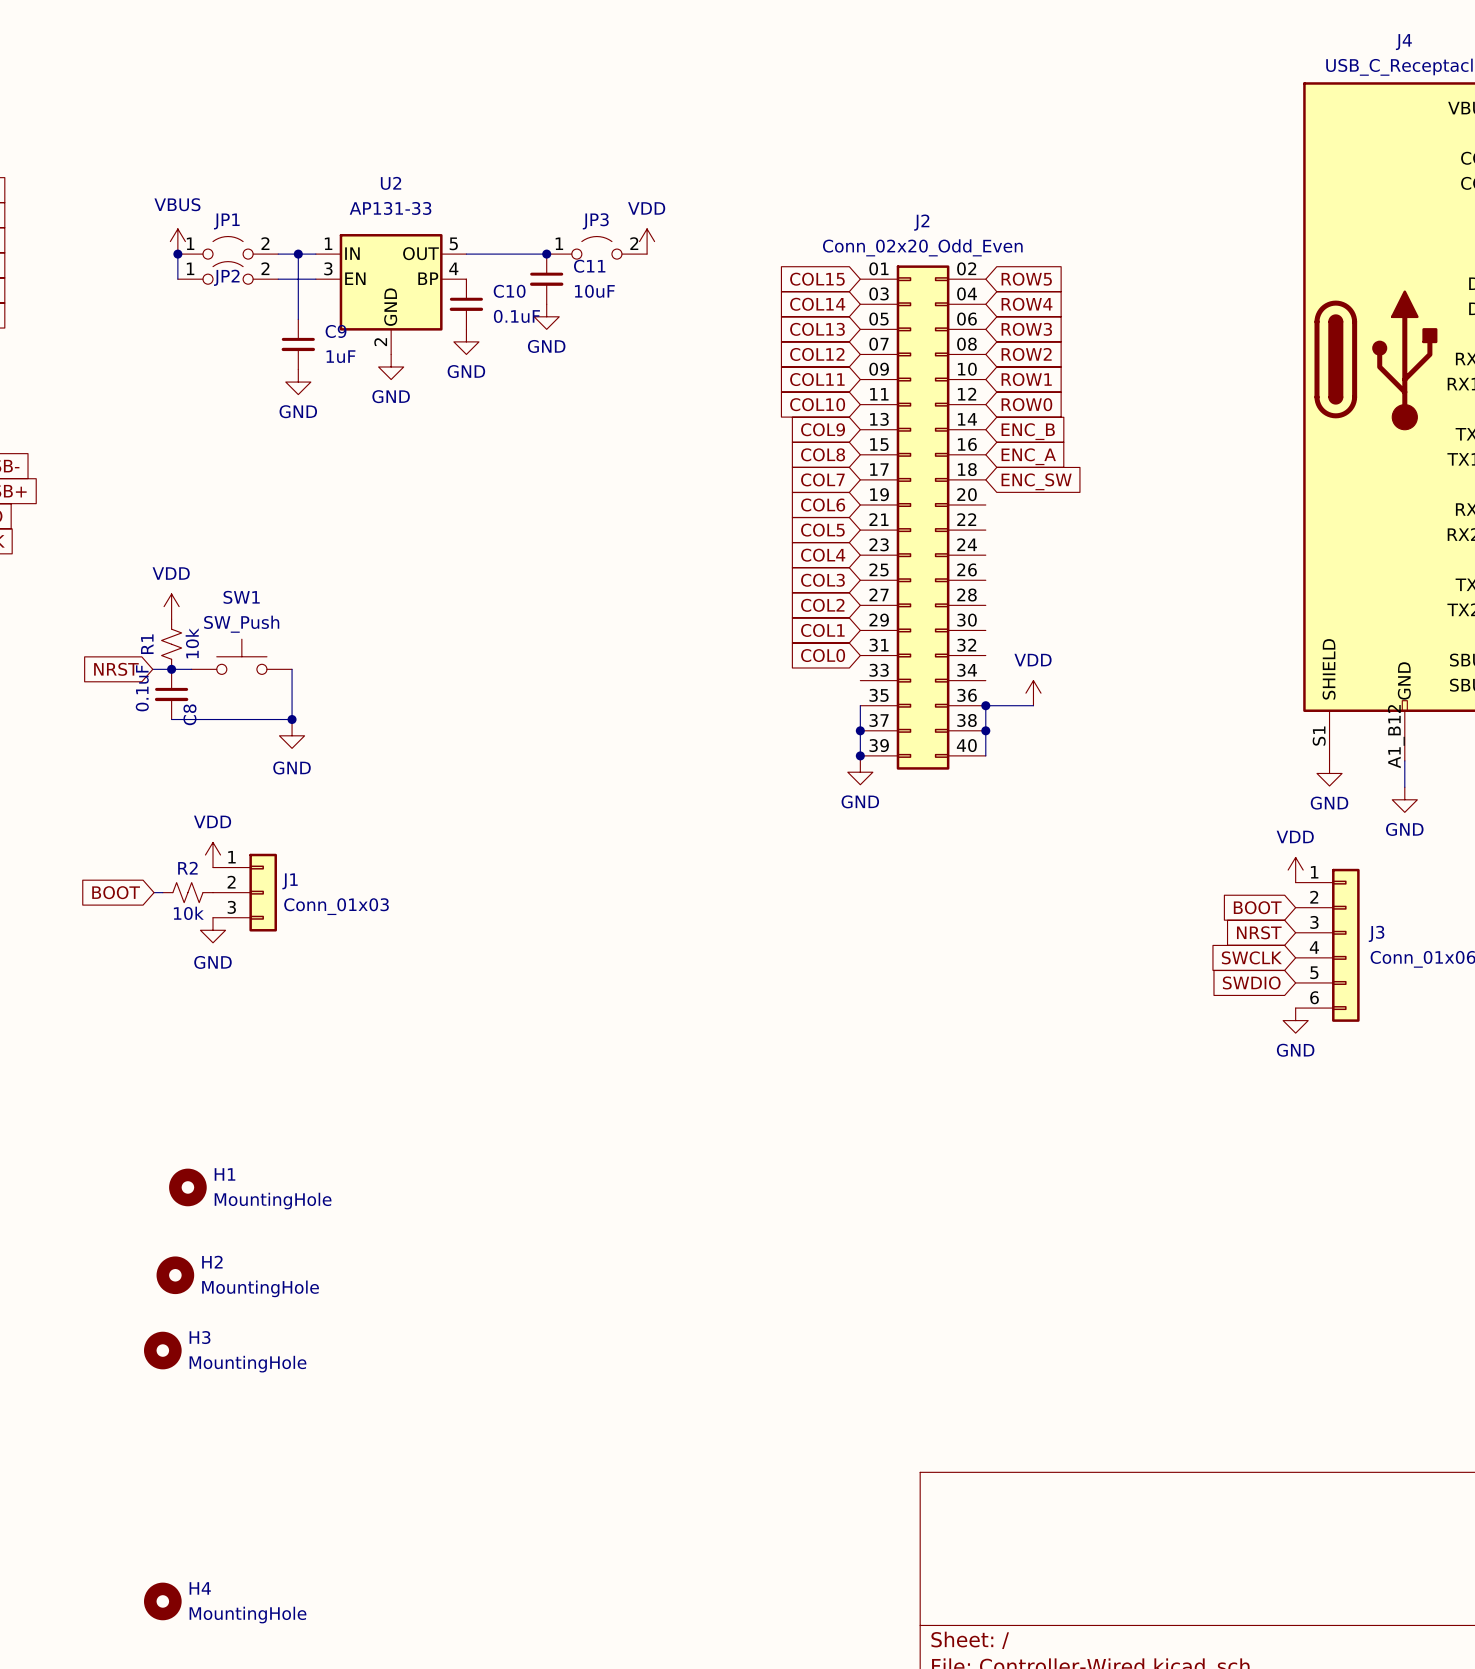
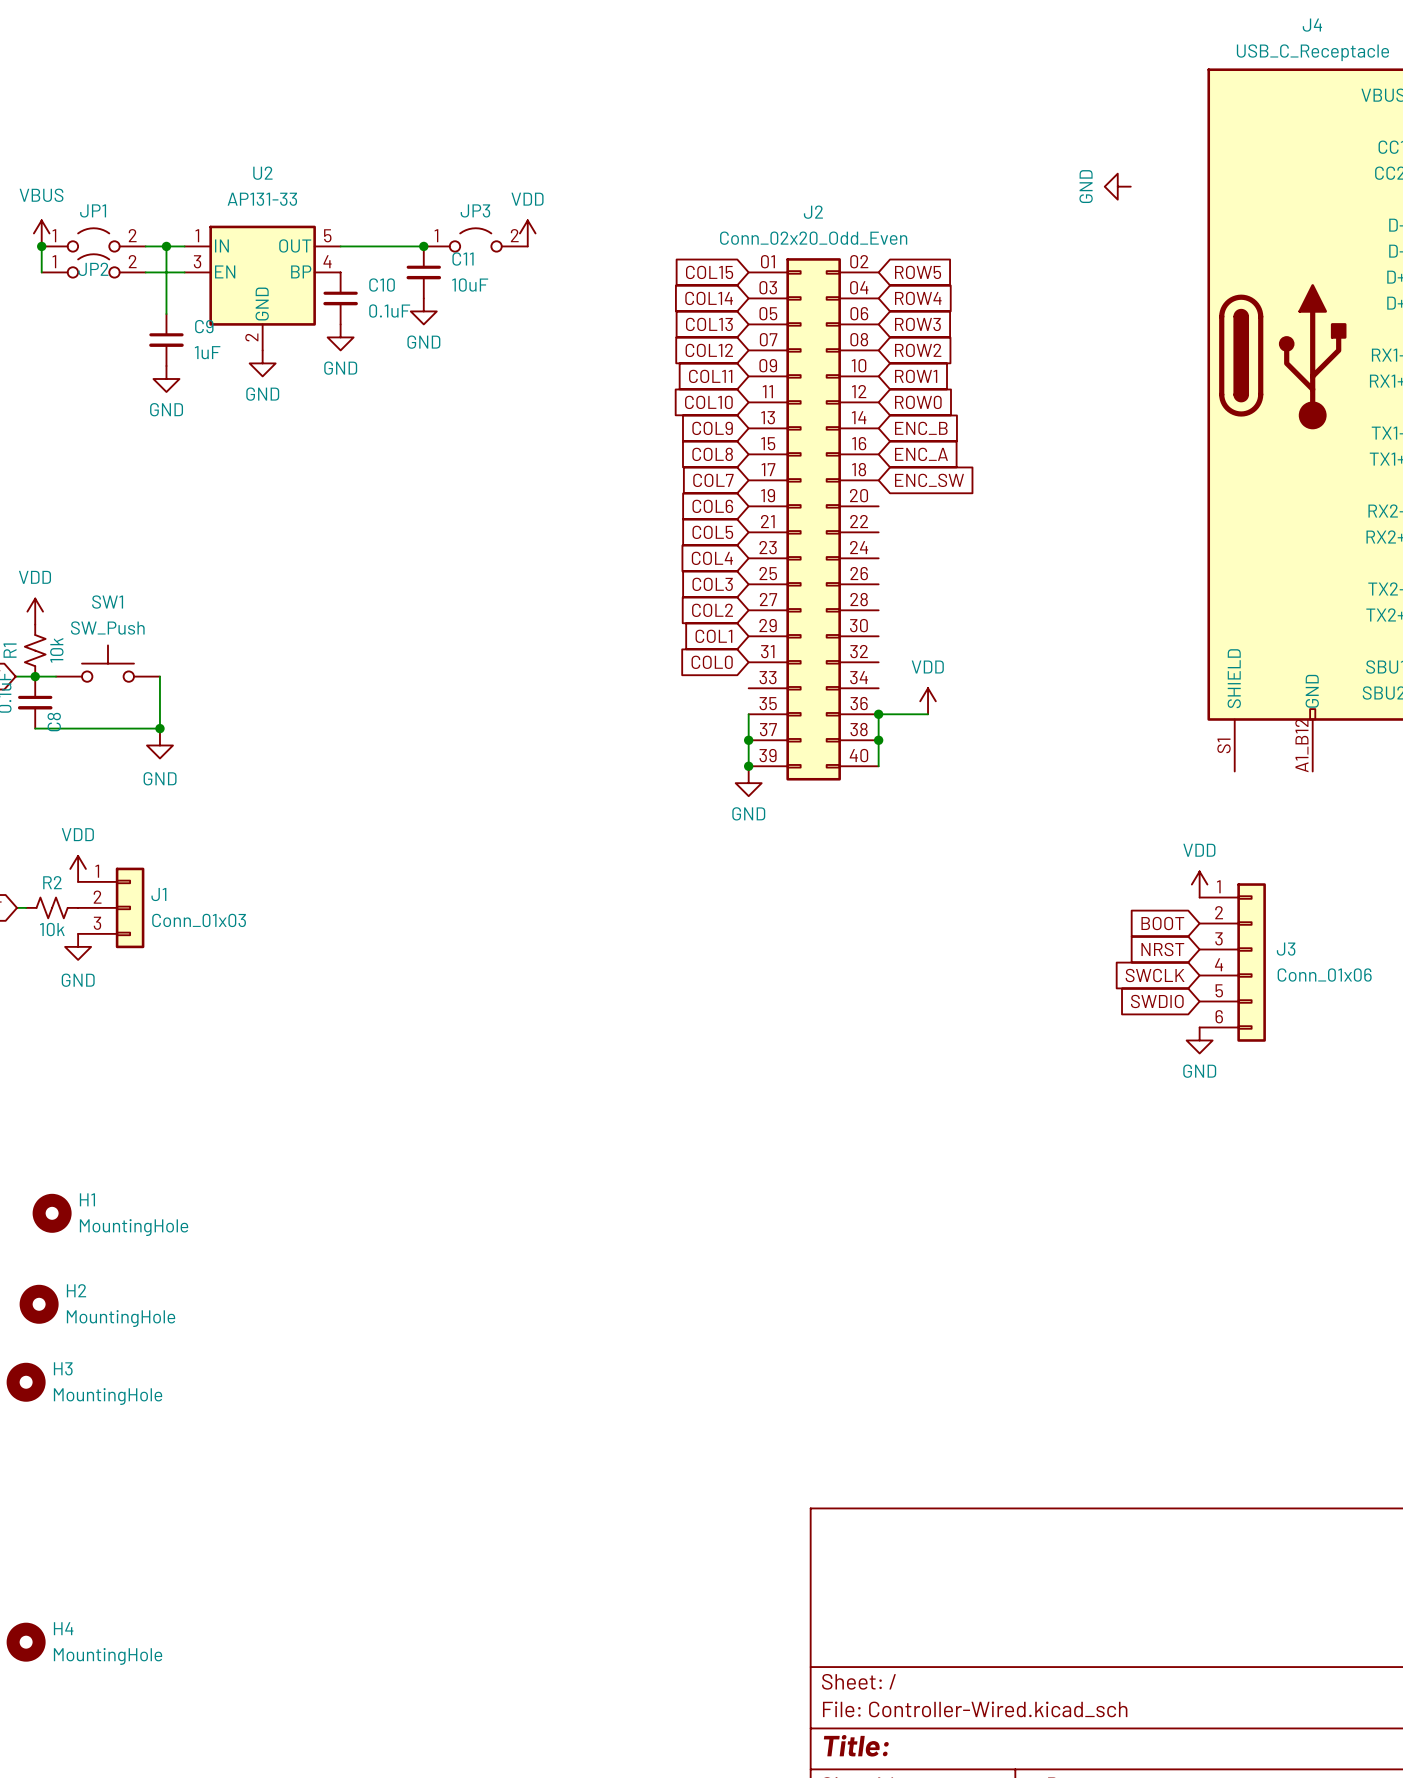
power symbol: none -> GND (1117, 186)
wire: (1404, 760) (1404, 787) -> none
power symbol: GND (1329, 773) -> none
power symbol: GND (1404, 799) -> none

